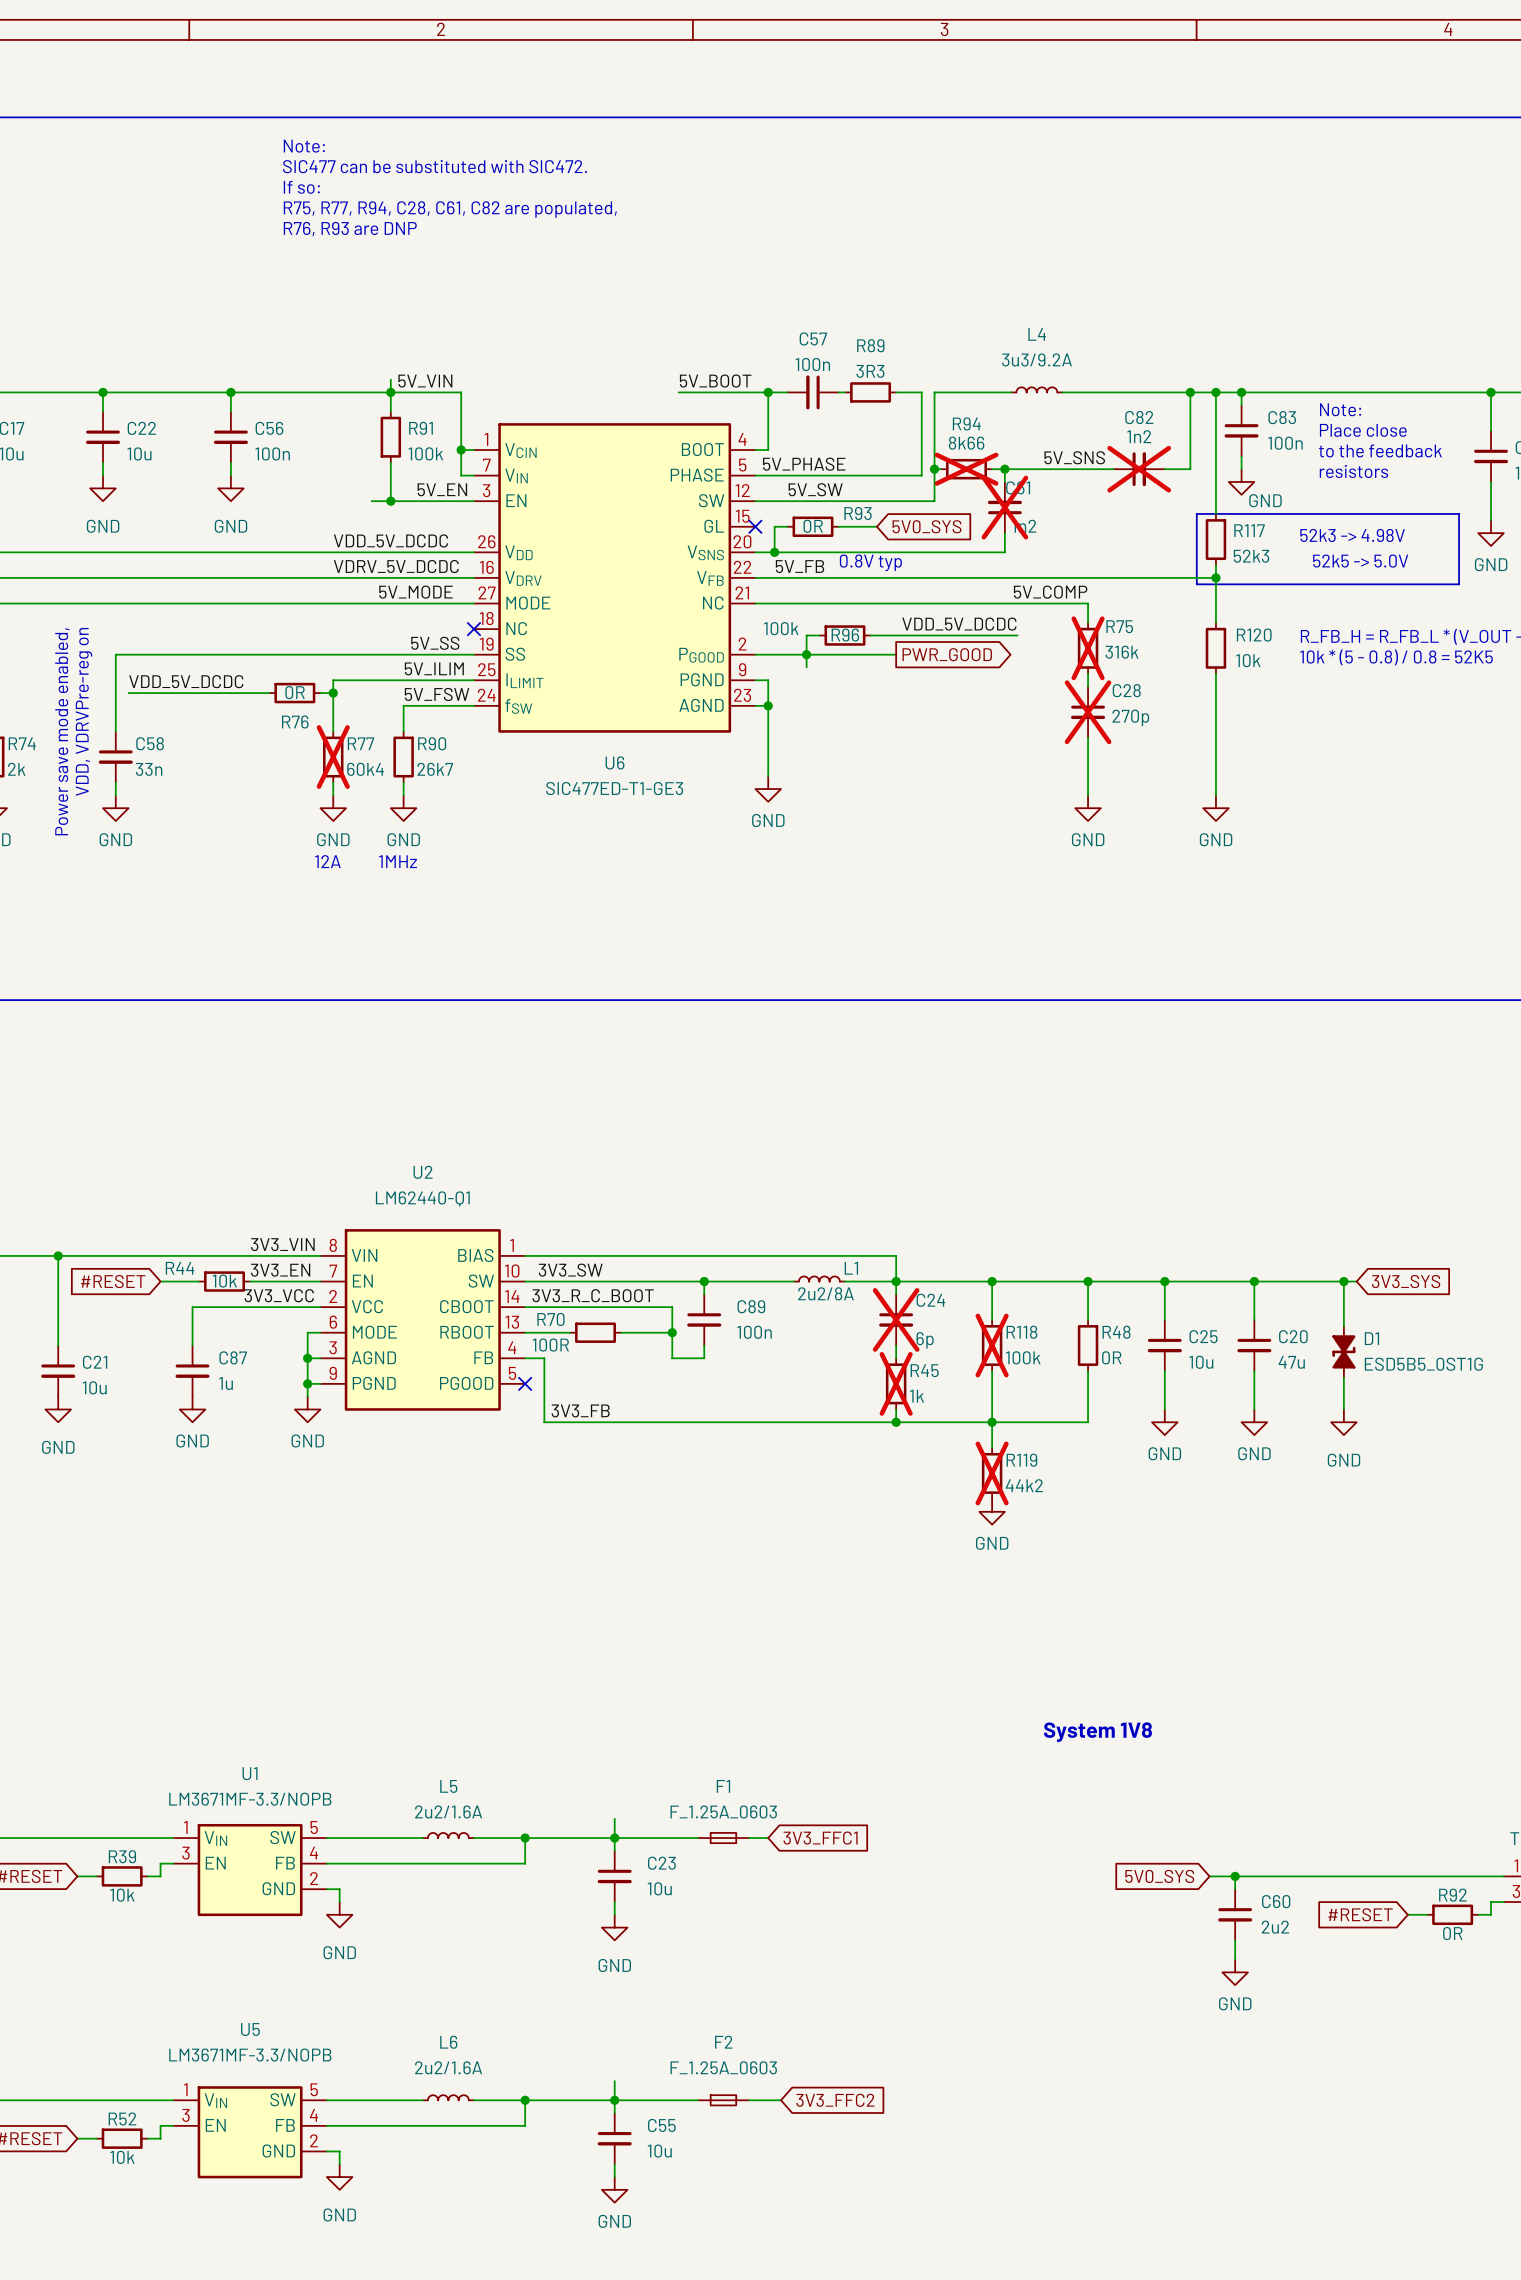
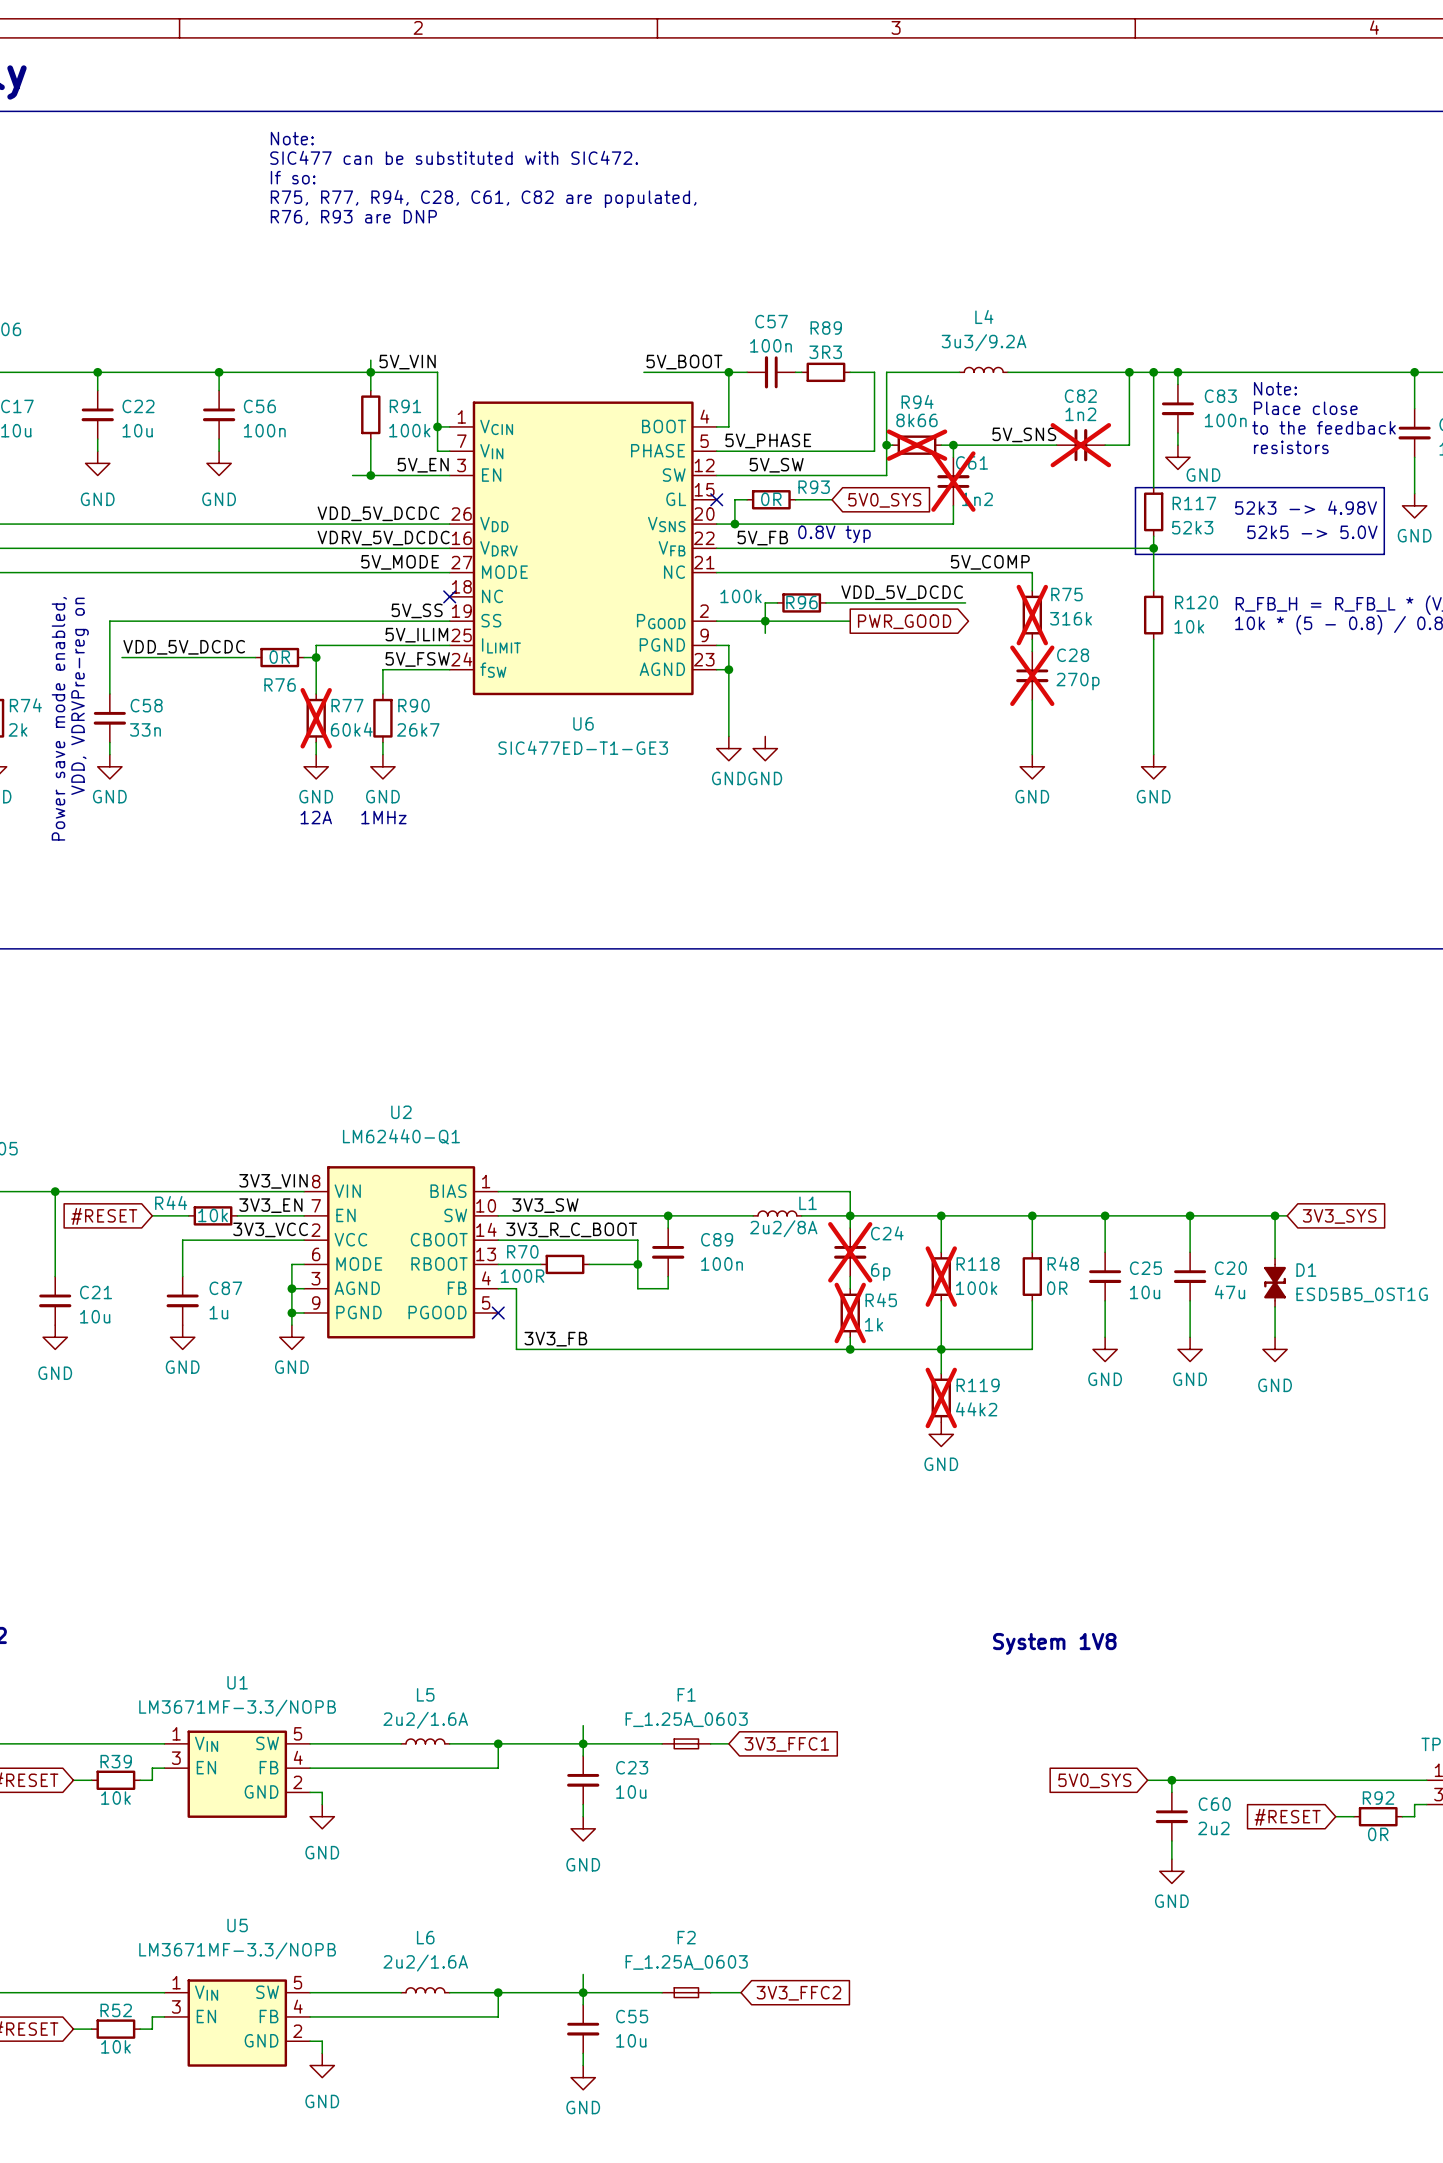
power symbol: none -> GND (765, 748)

